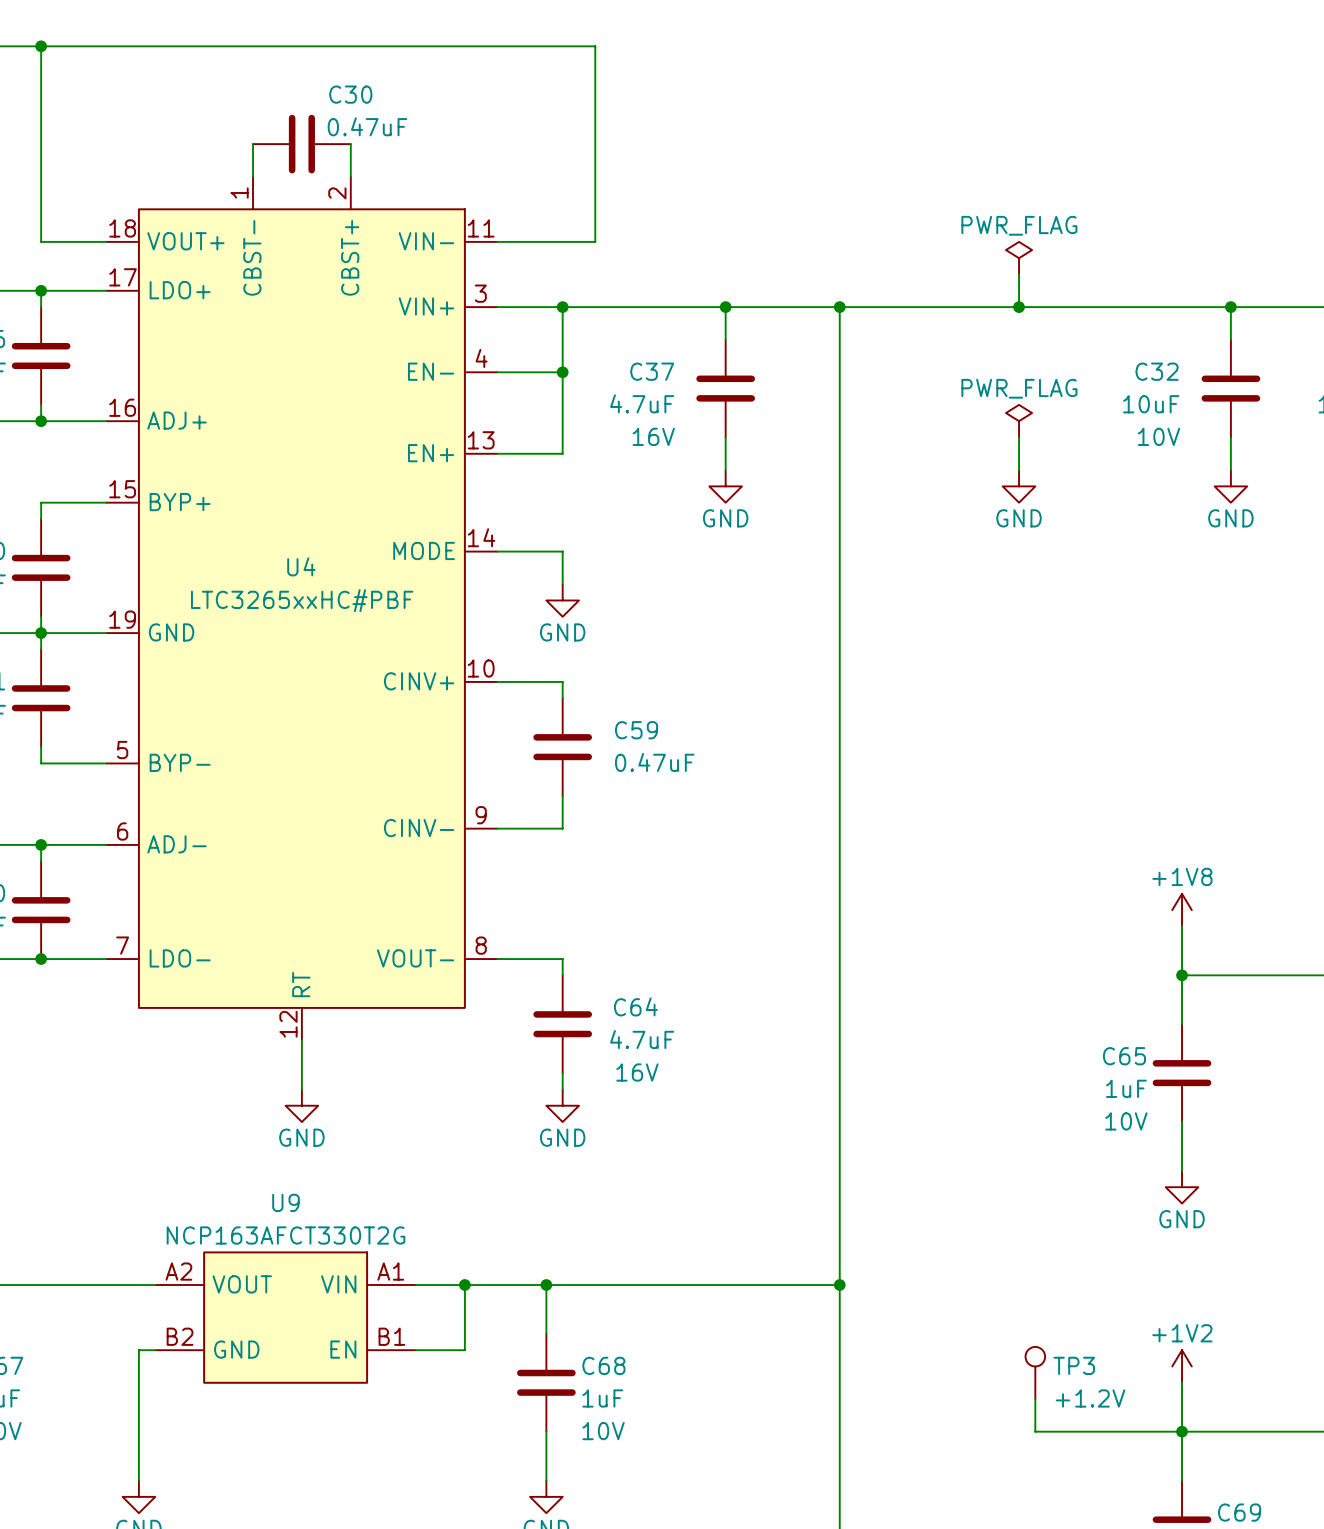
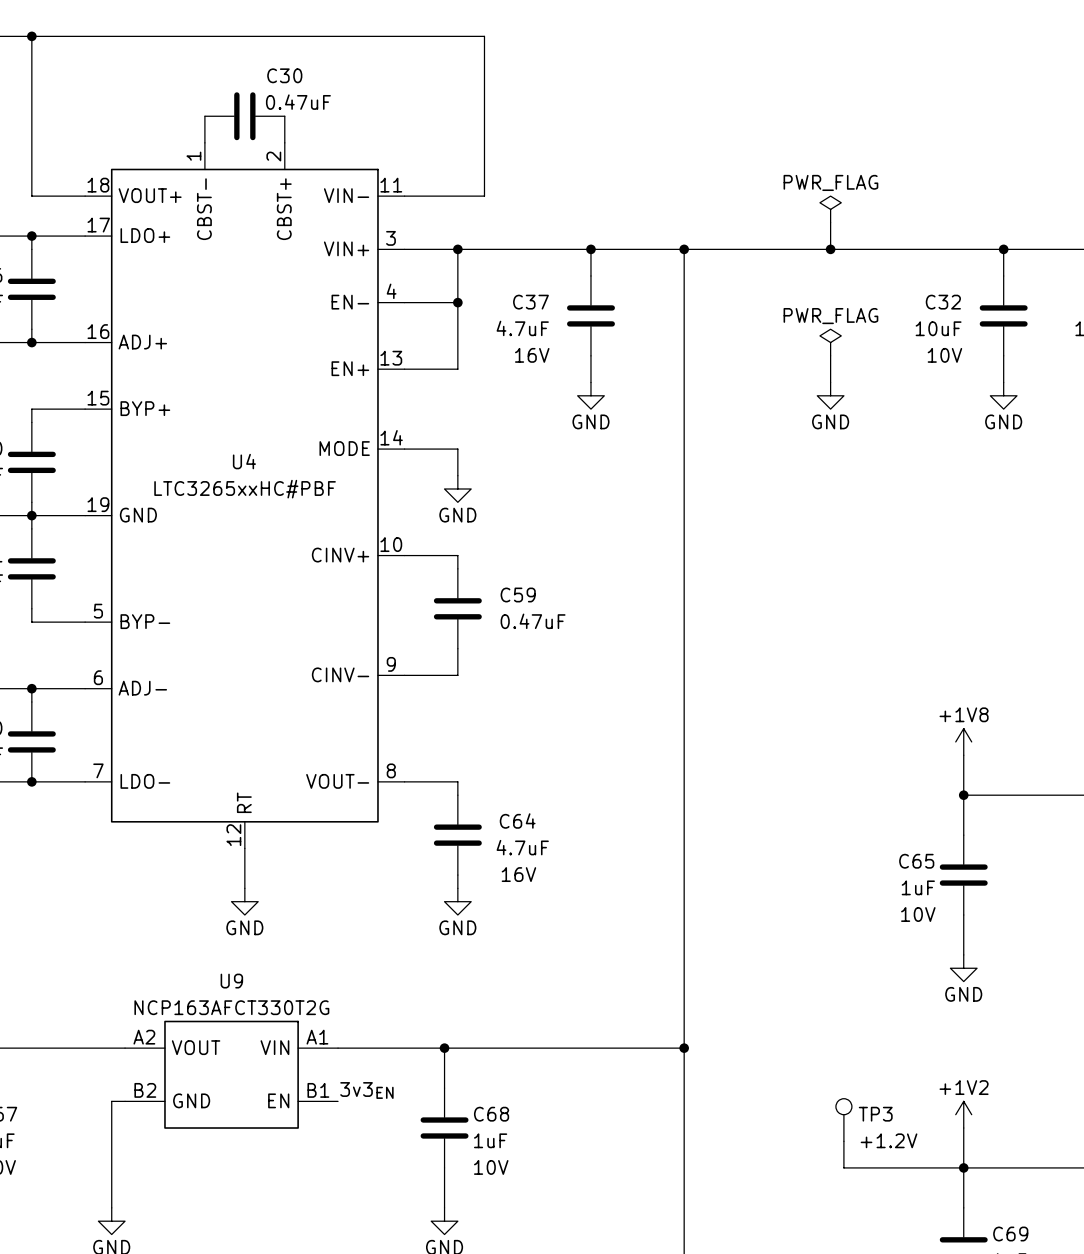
wire: (464, 1285) (464, 1350) (415, 1350) -> none
junction: (464, 1285) -> none
label: none -> 3v3EN (366, 1090)

